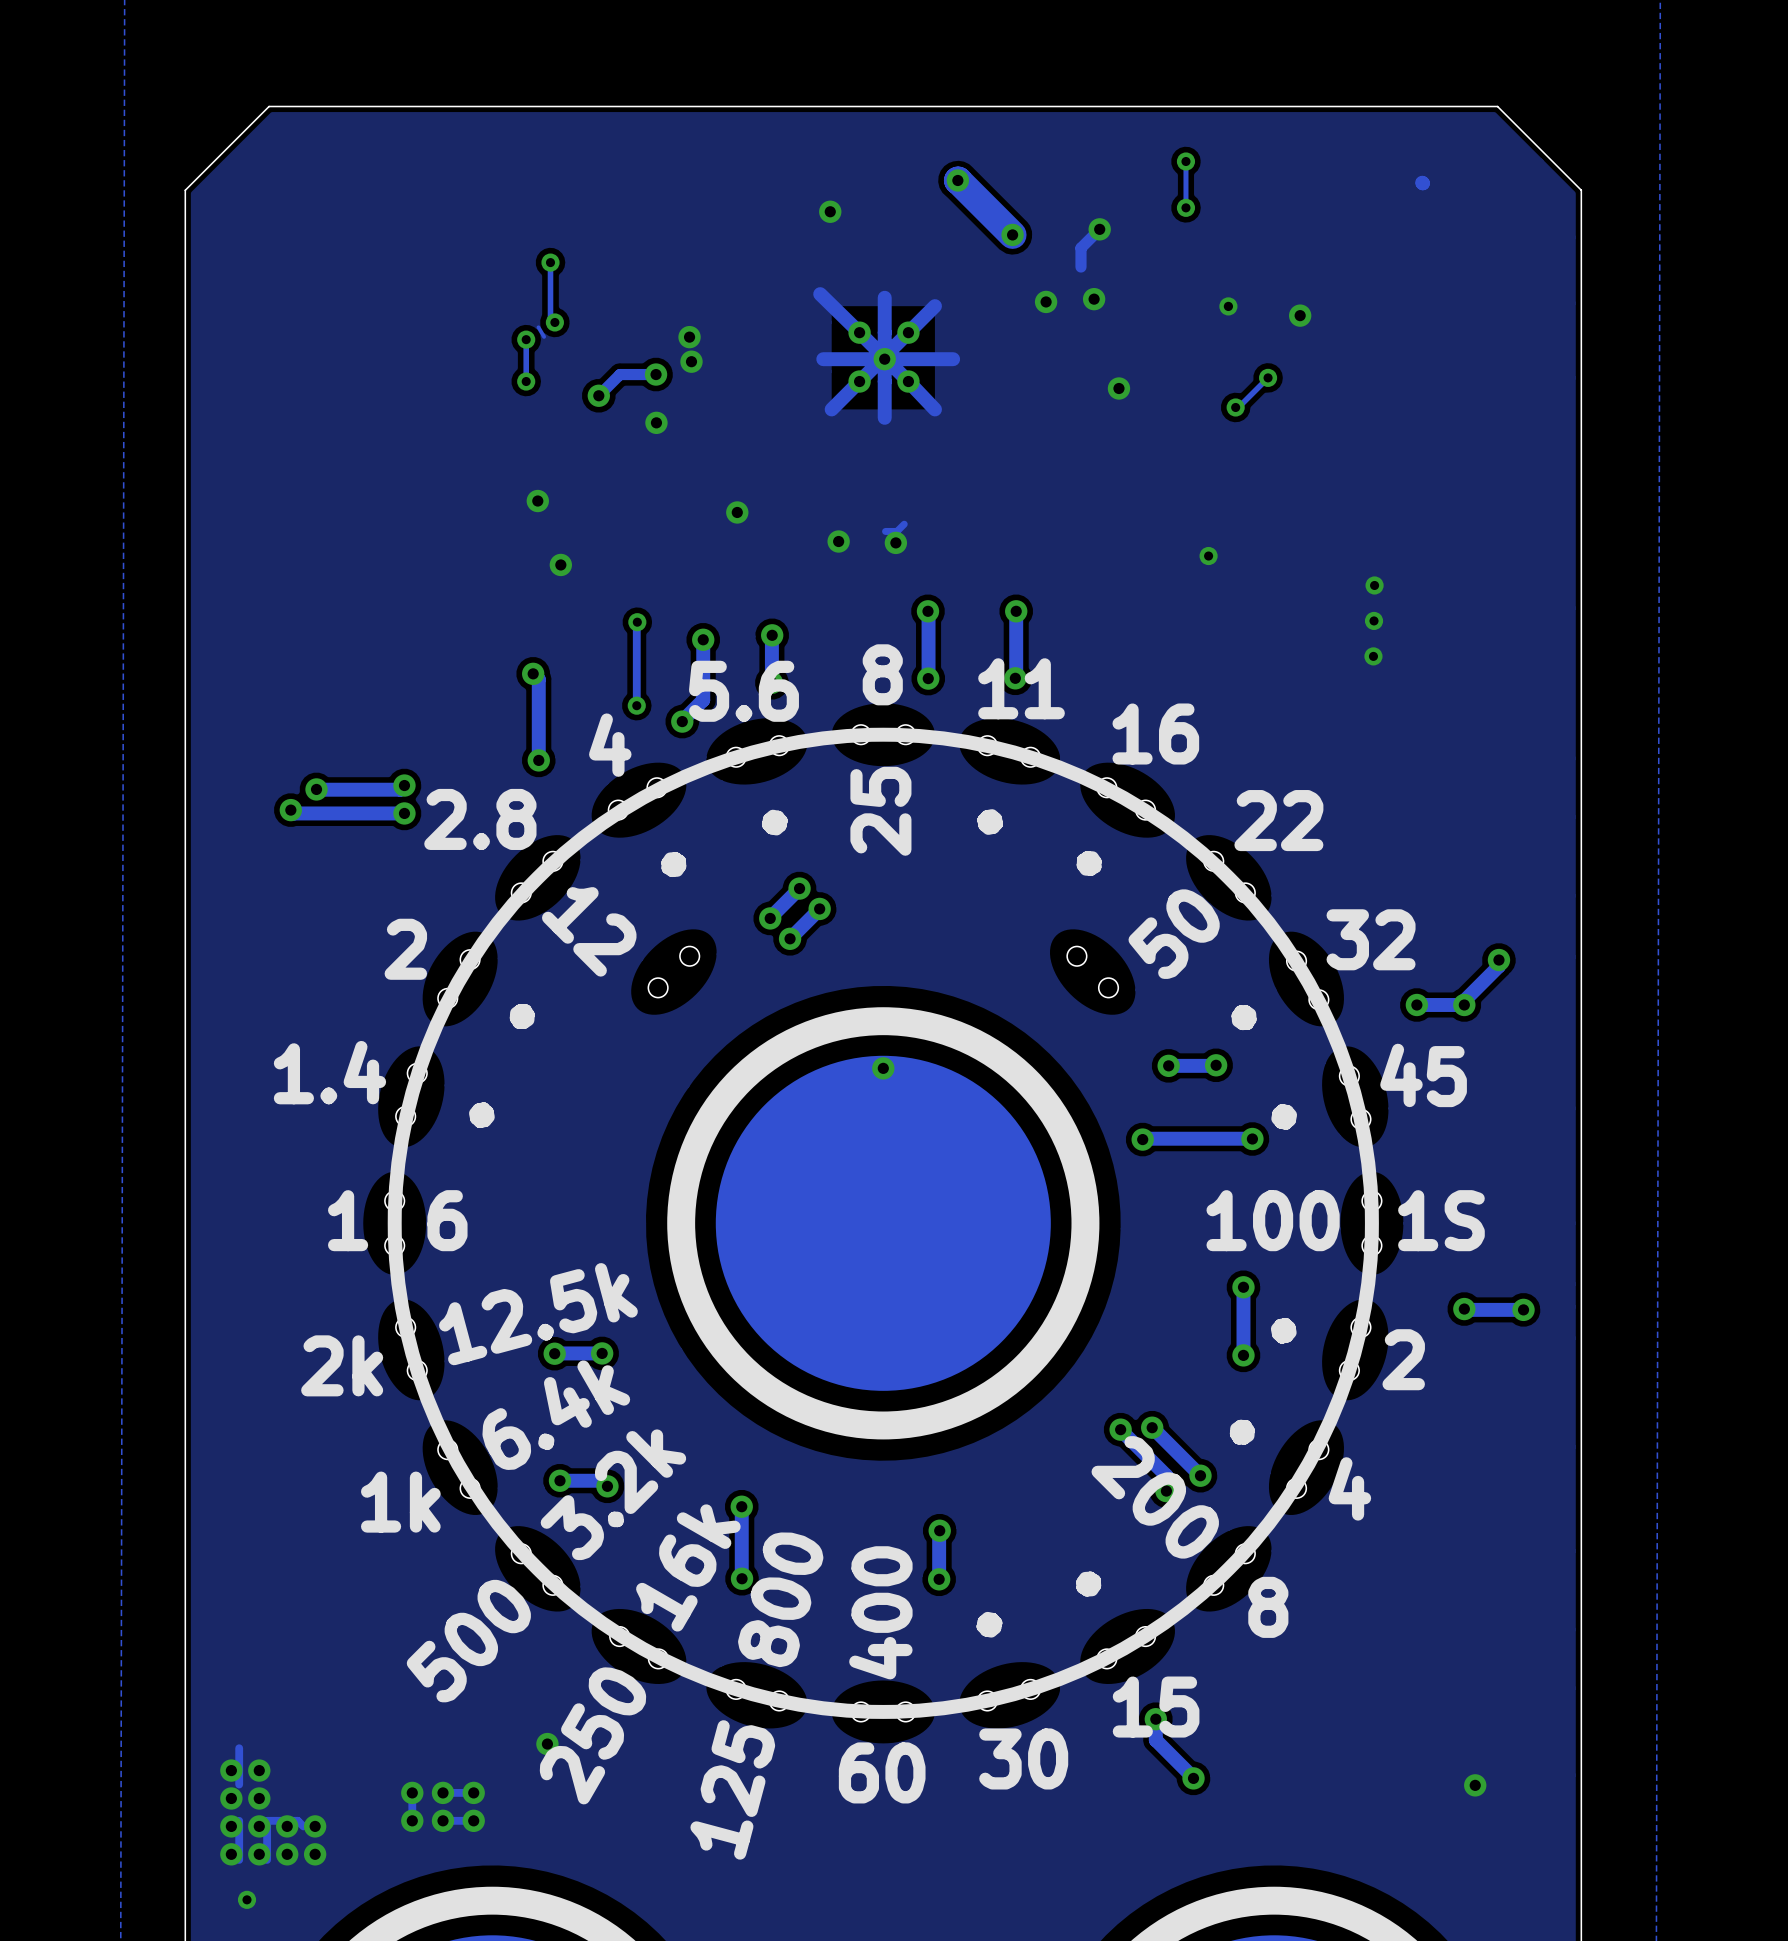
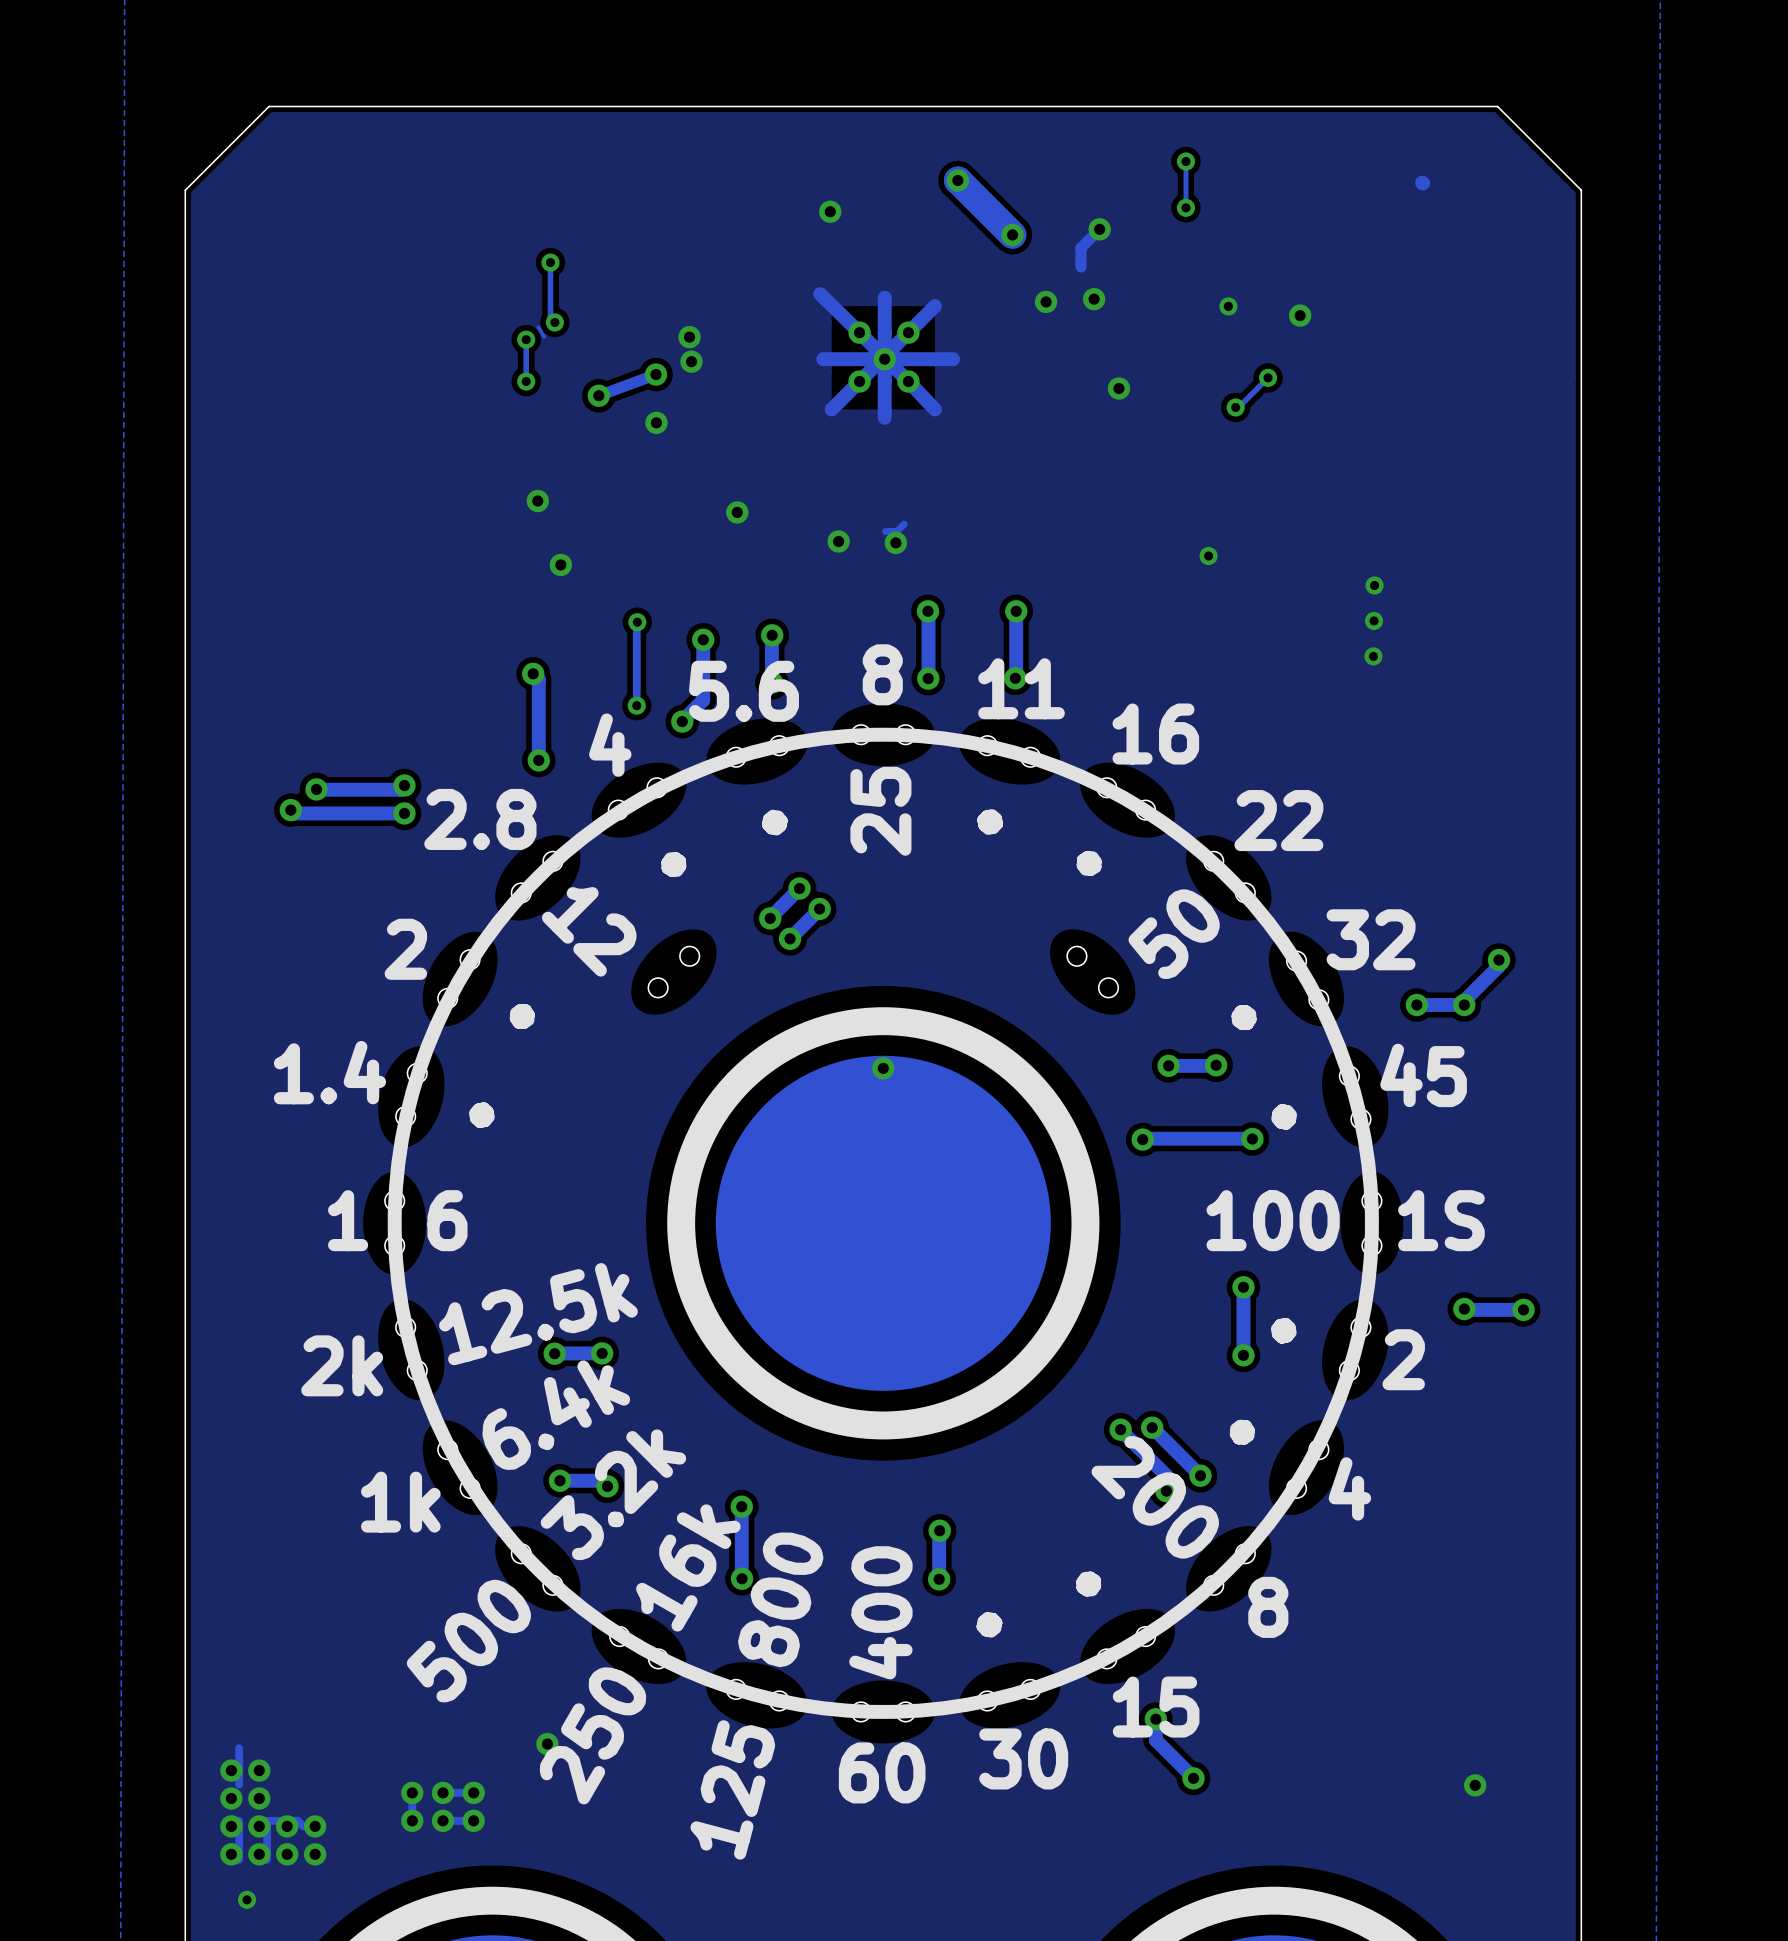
track: (656, 374) (620, 374) (598, 395) -> (656, 374) (598, 395)

